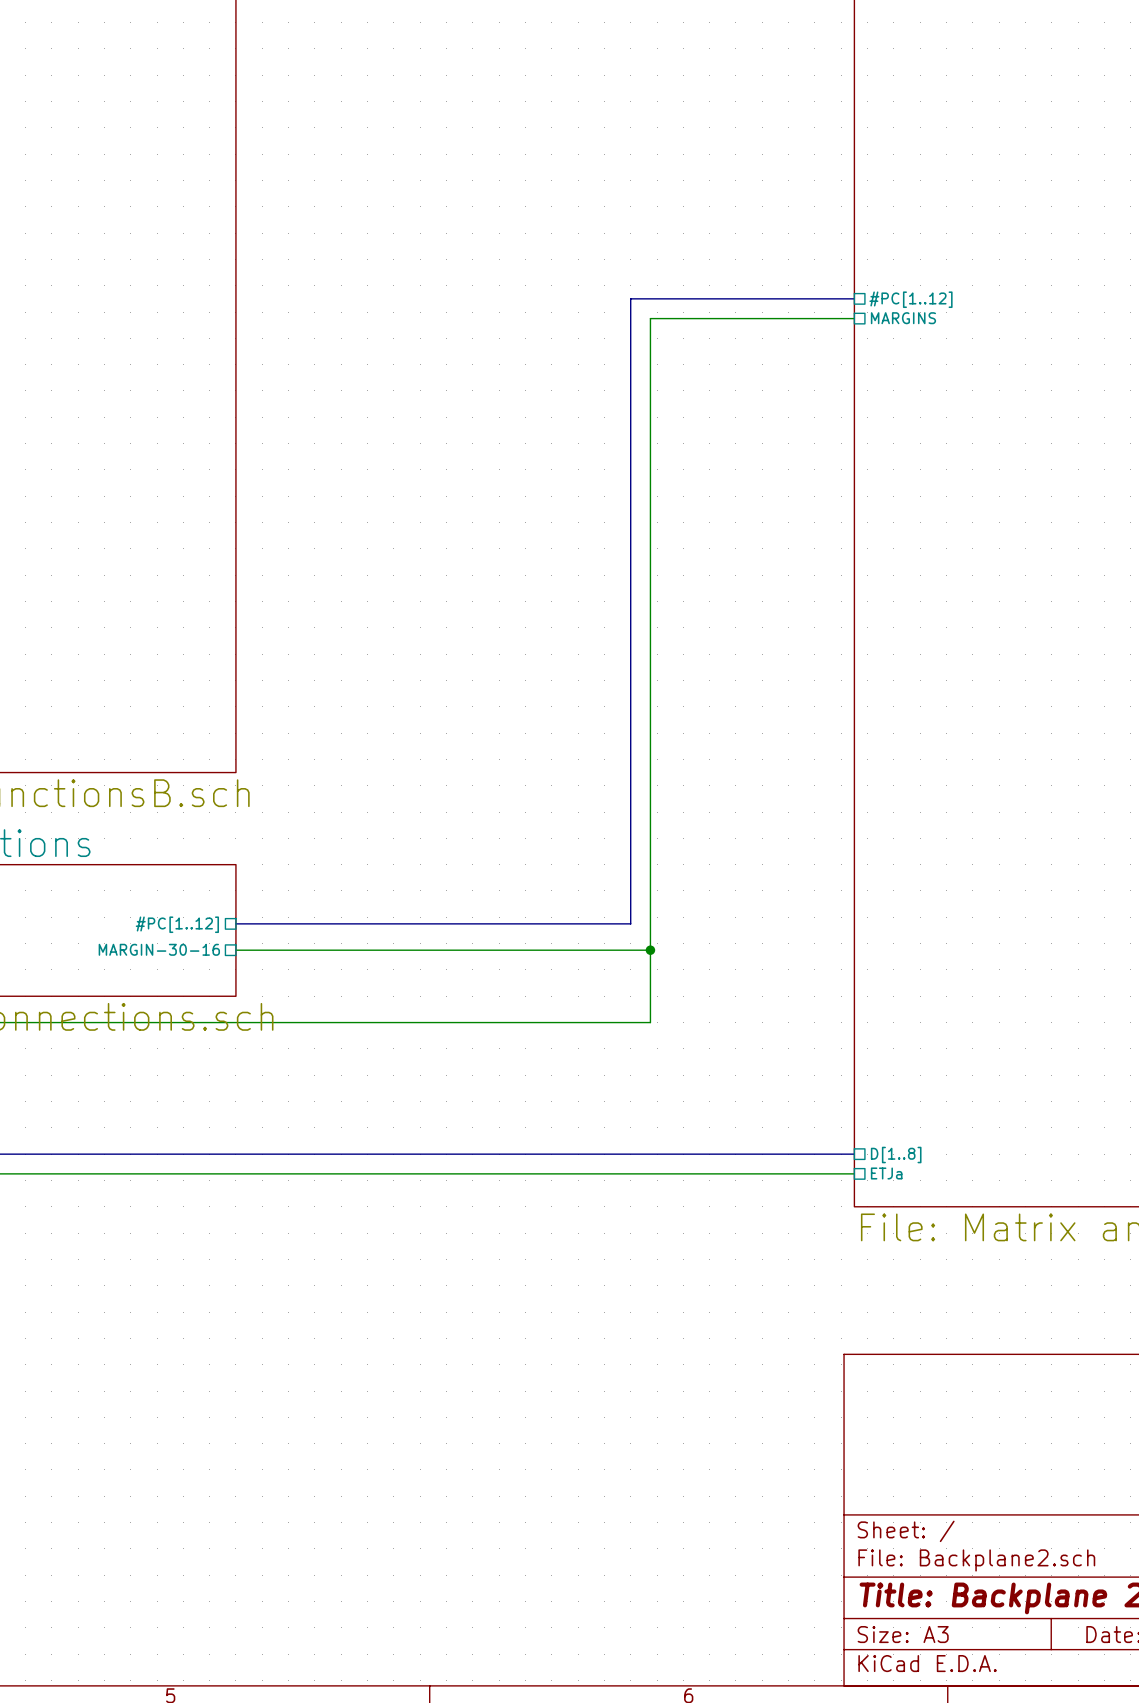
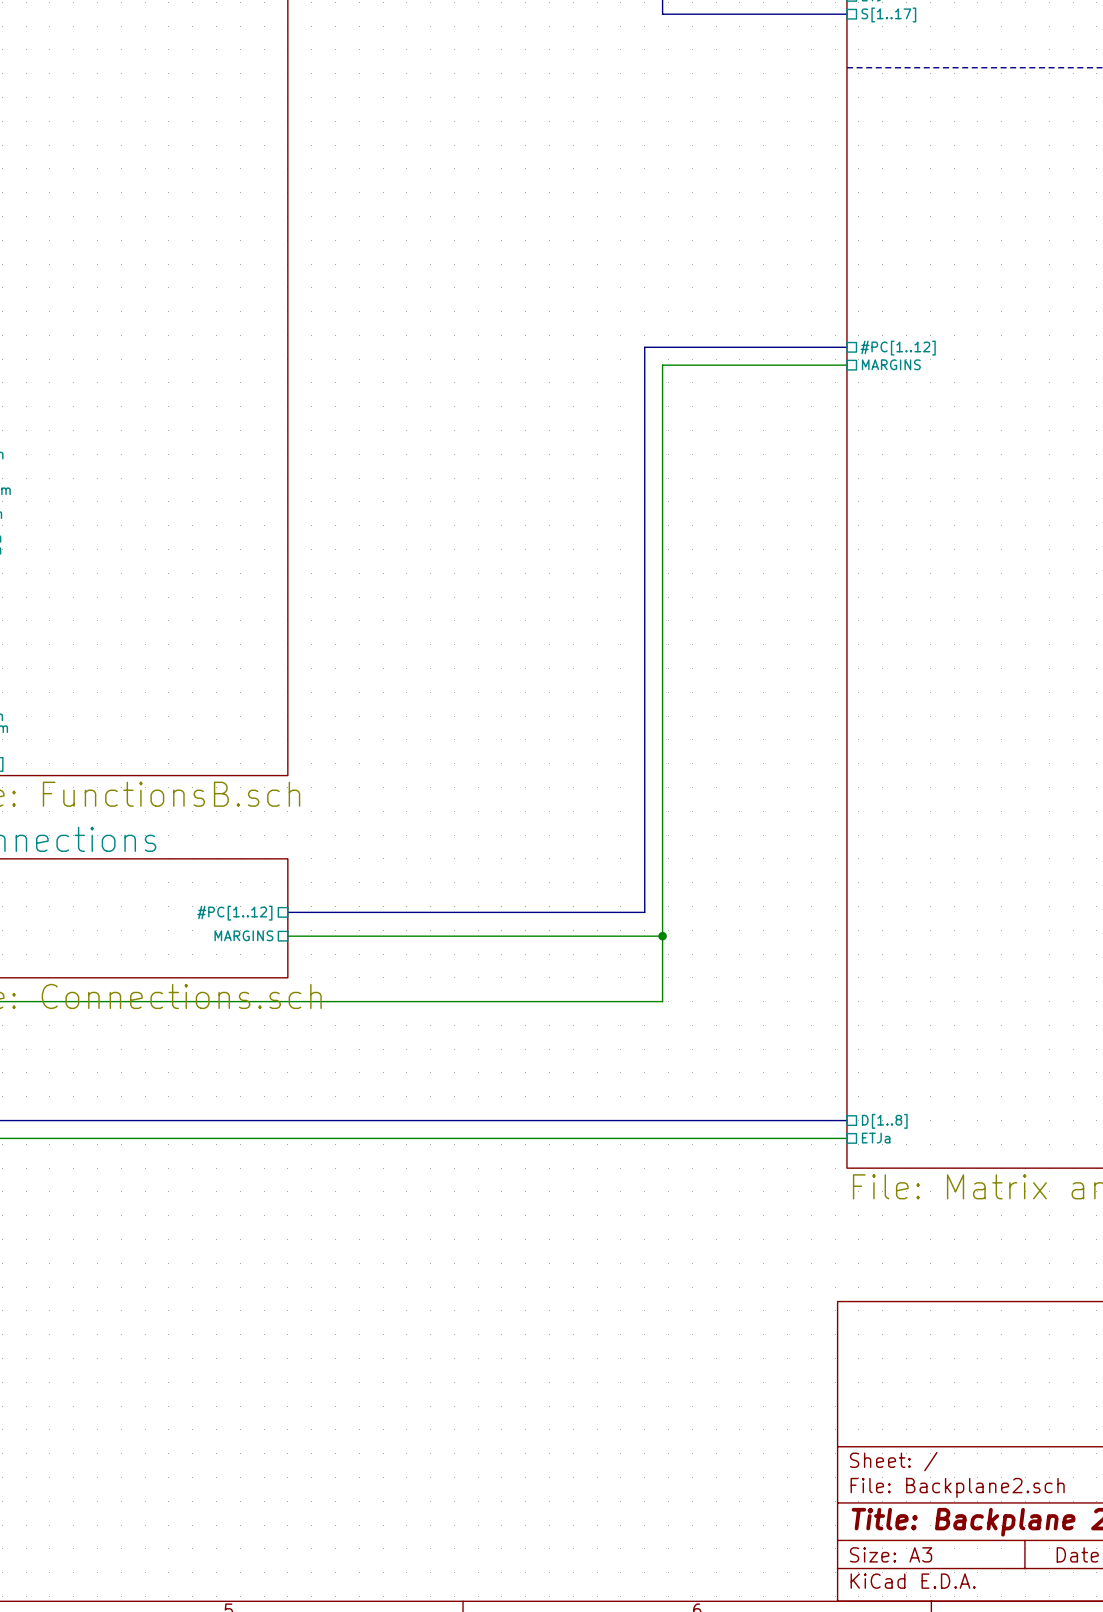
sheet pin: MARGIN-30-16 (159, 949) -> MARGINS (243, 935)

